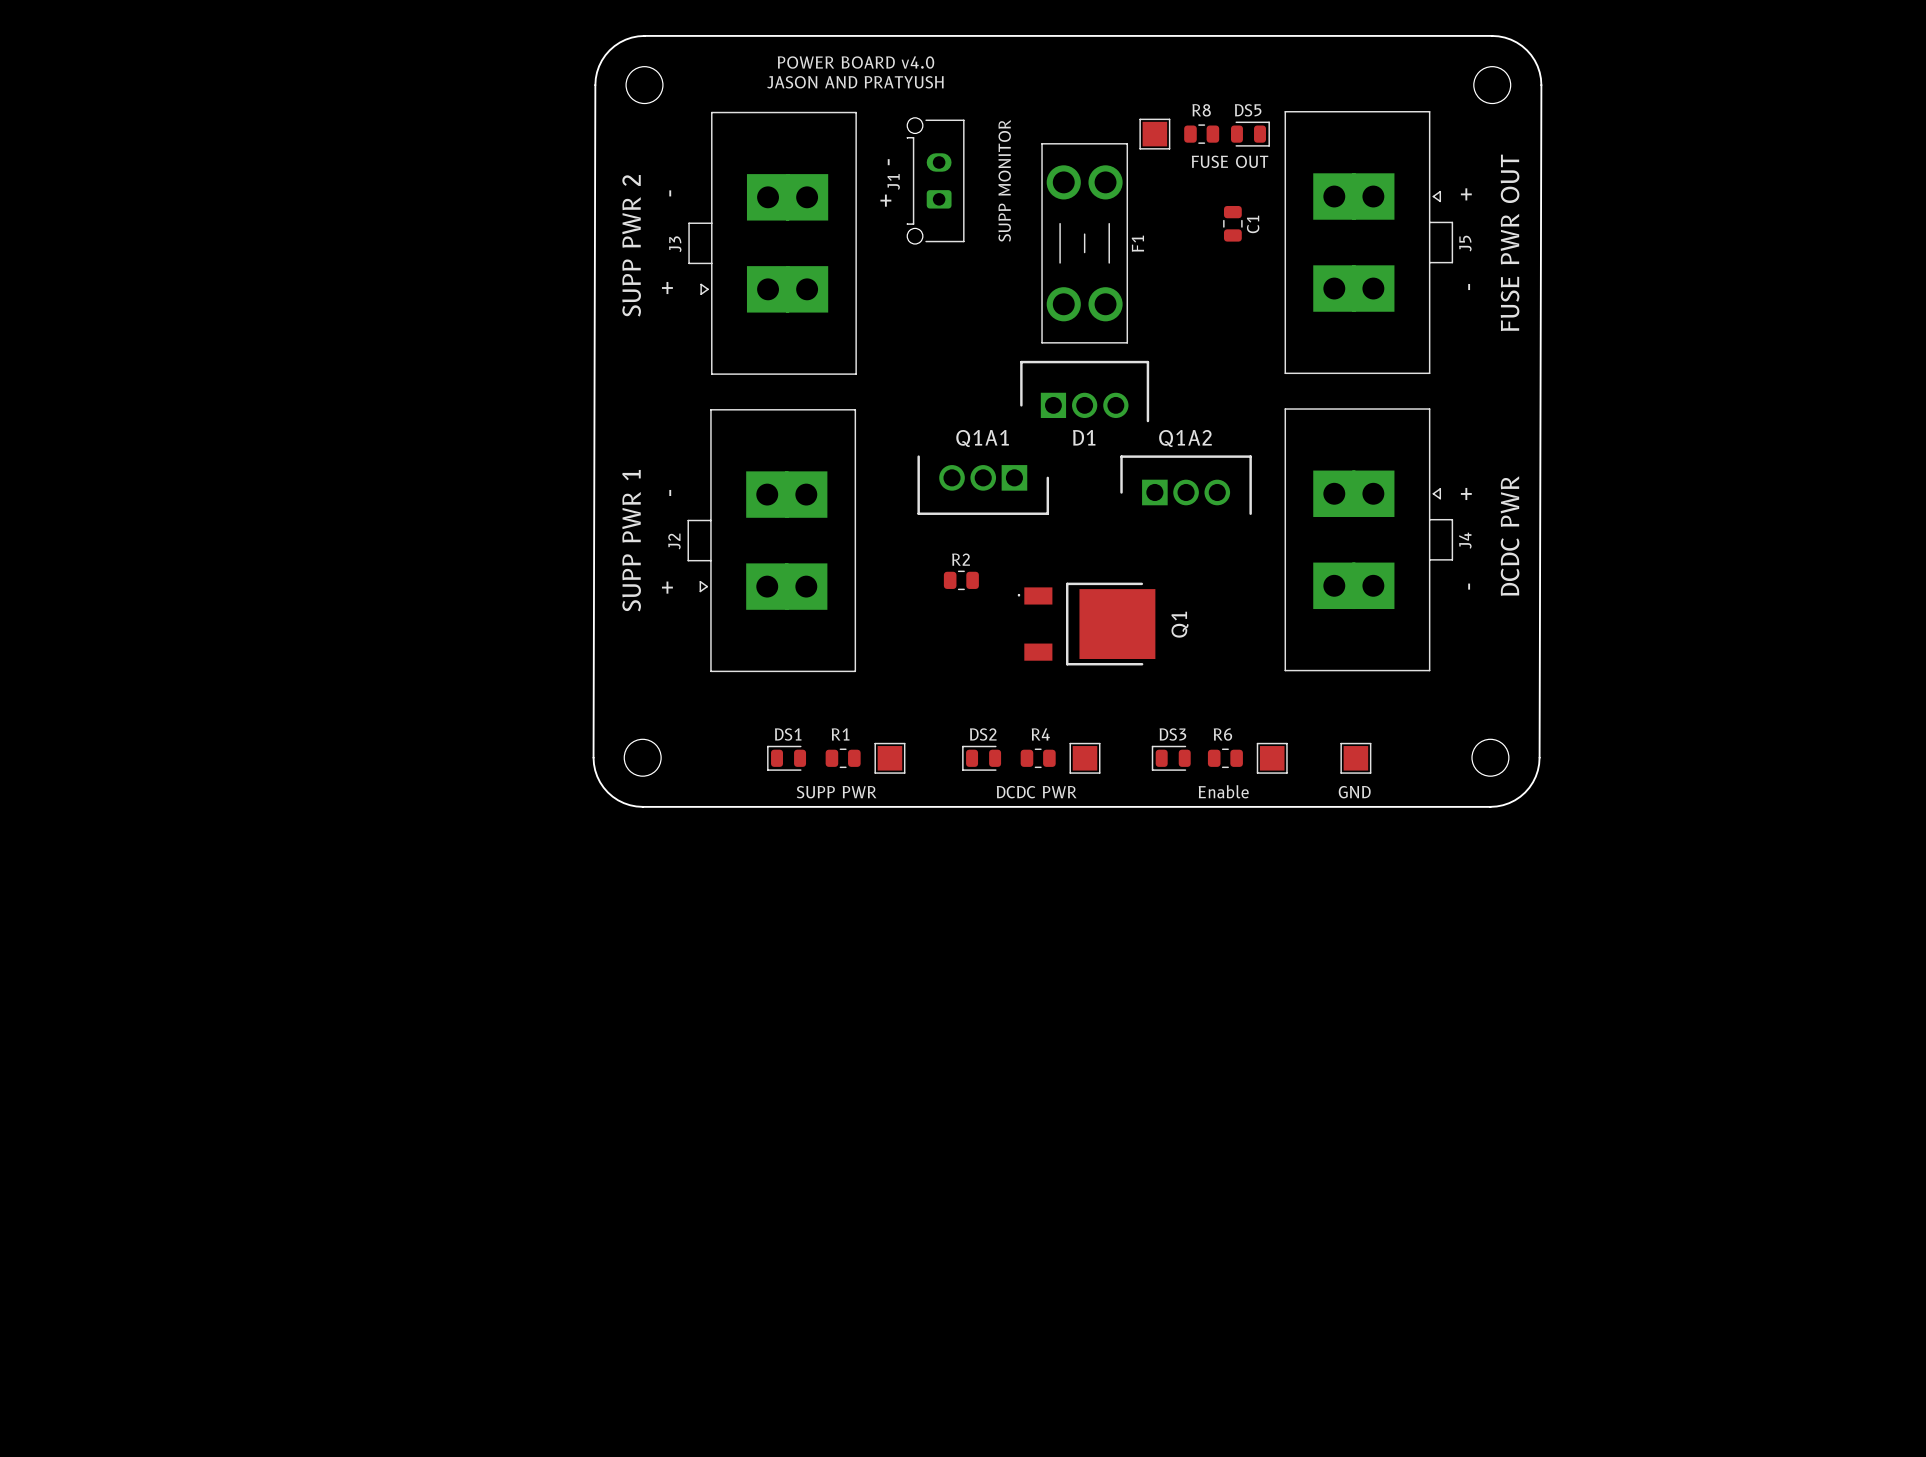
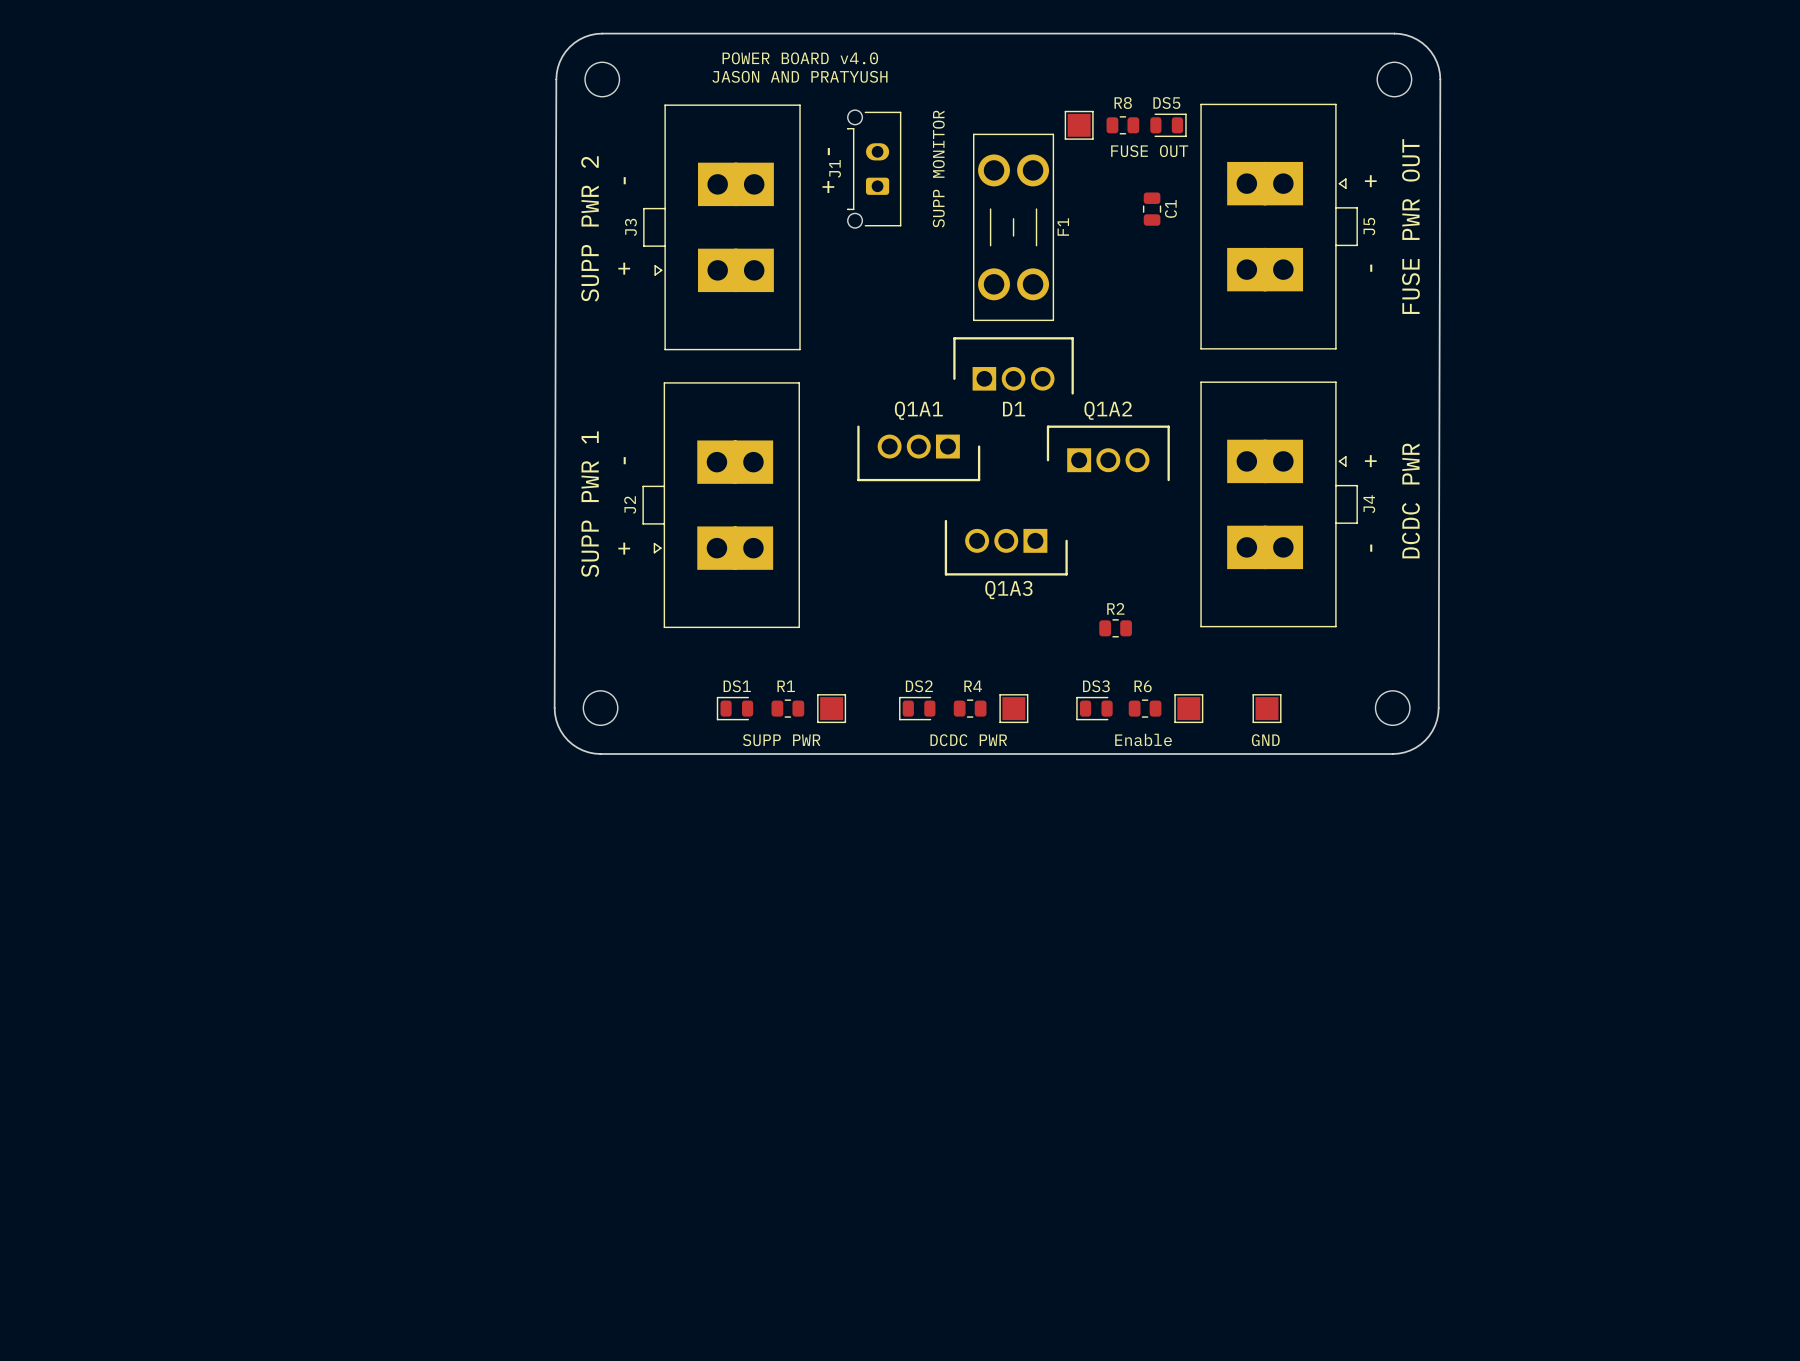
R2 position: (961, 580) -> (1115, 628)
Q1A3: none -> (1006, 547)
Q1: (1086, 624) -> none

